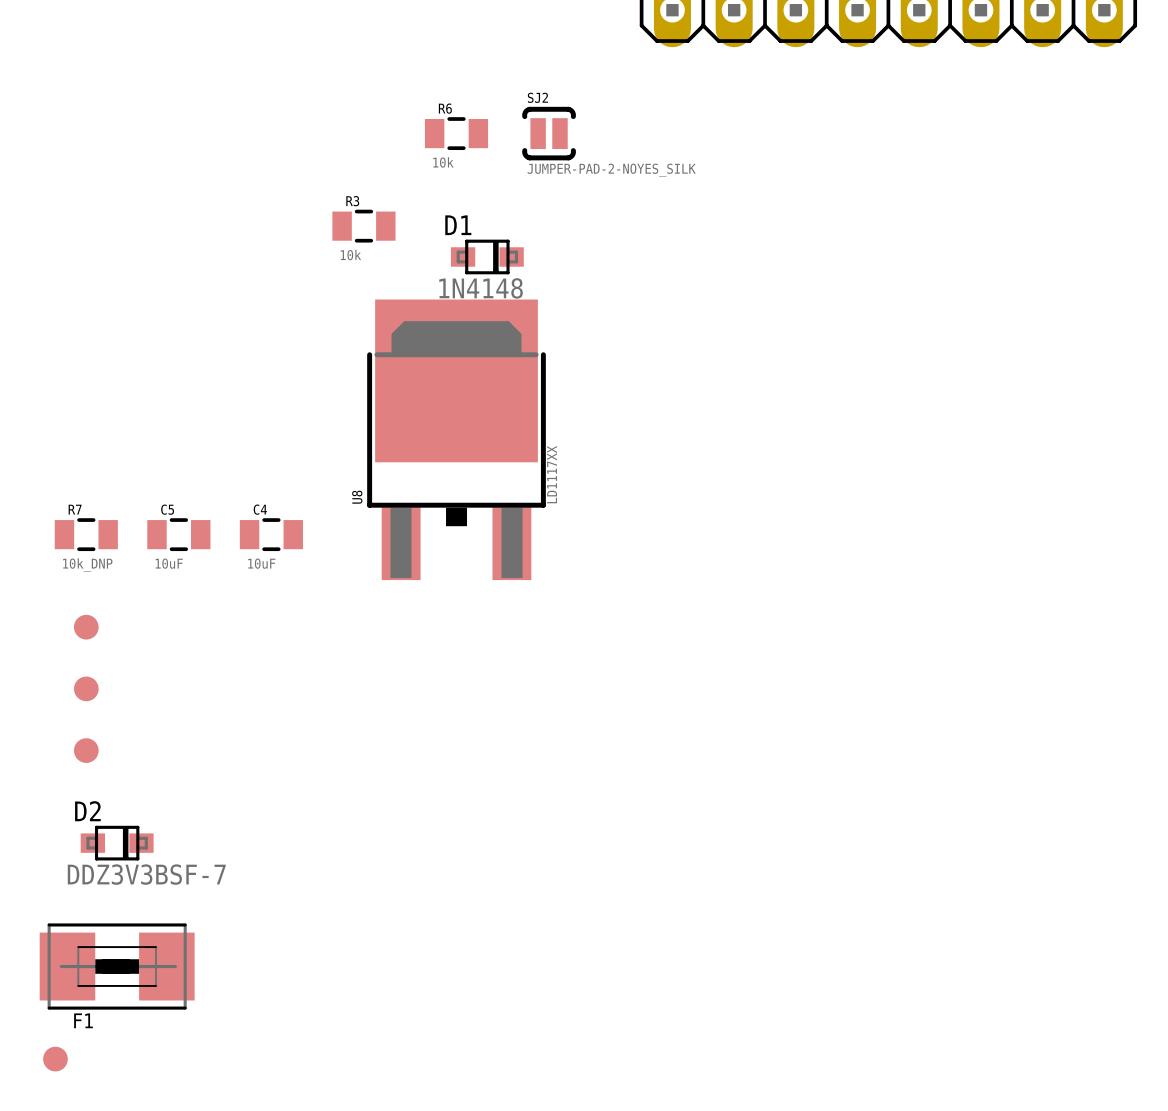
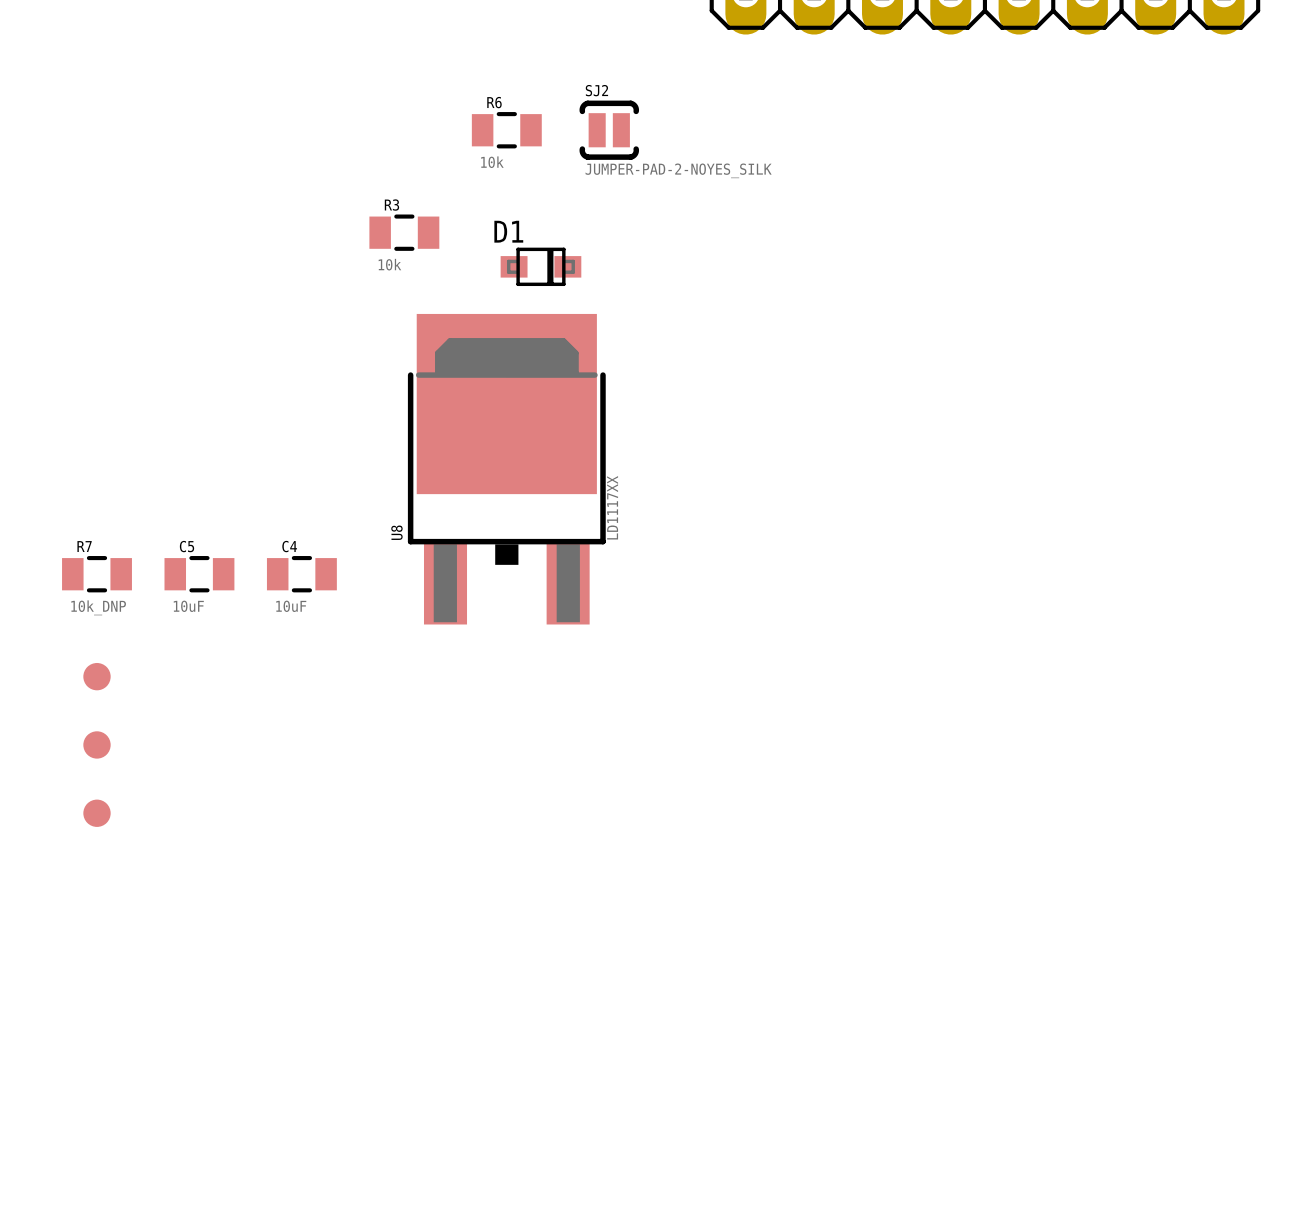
D1 value: 1N4148 (481, 288) -> none
D2: DDZ3V3BSF-7 (117, 843) -> none
F1: (117, 966) -> none
part: (55, 1059) -> none

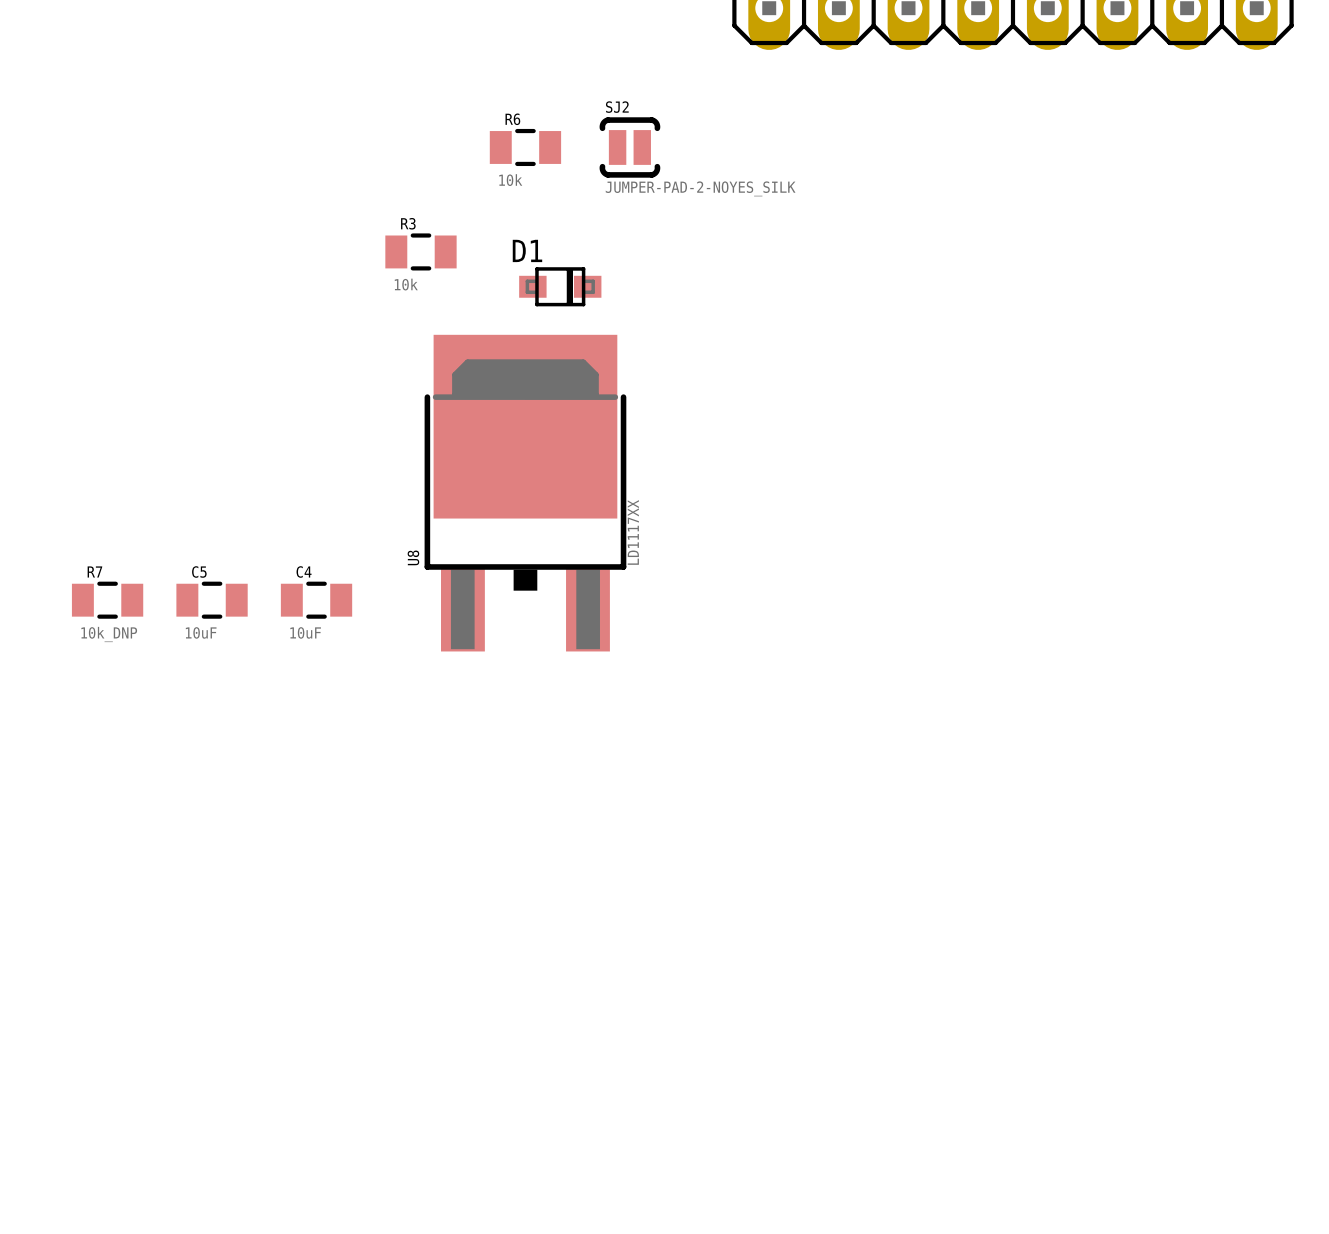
part: (97, 676) -> none
part: (97, 744) -> none
part: (97, 813) -> none

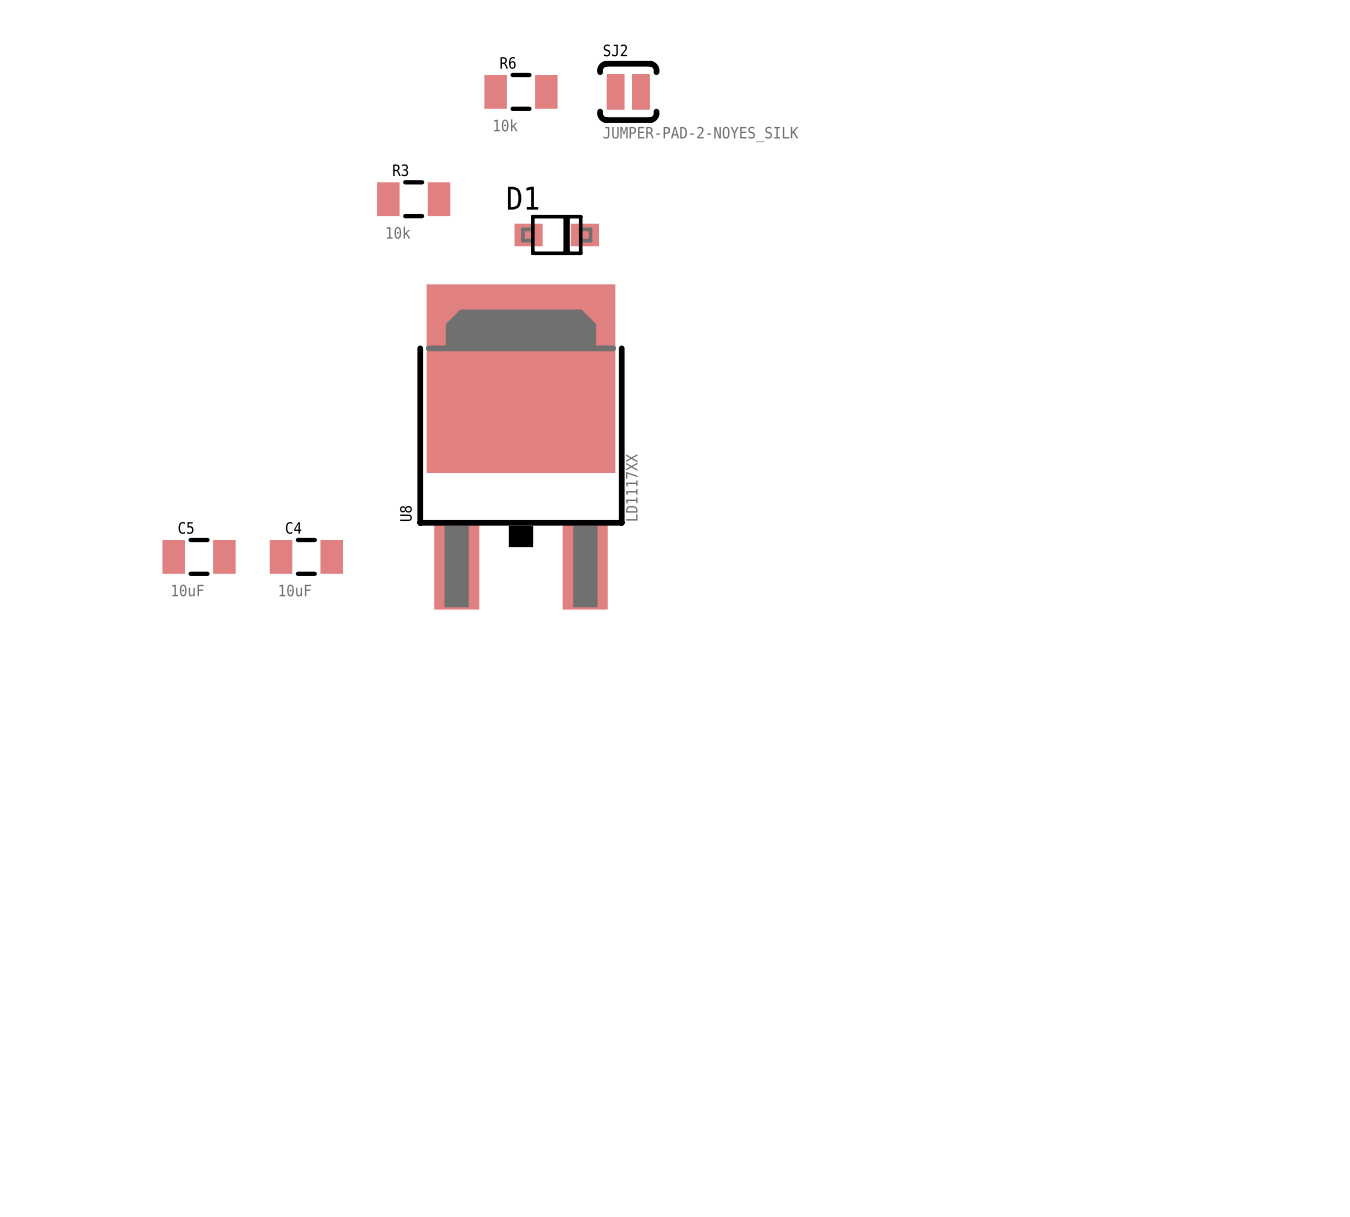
R7: 10k_DNP (107, 600) -> none

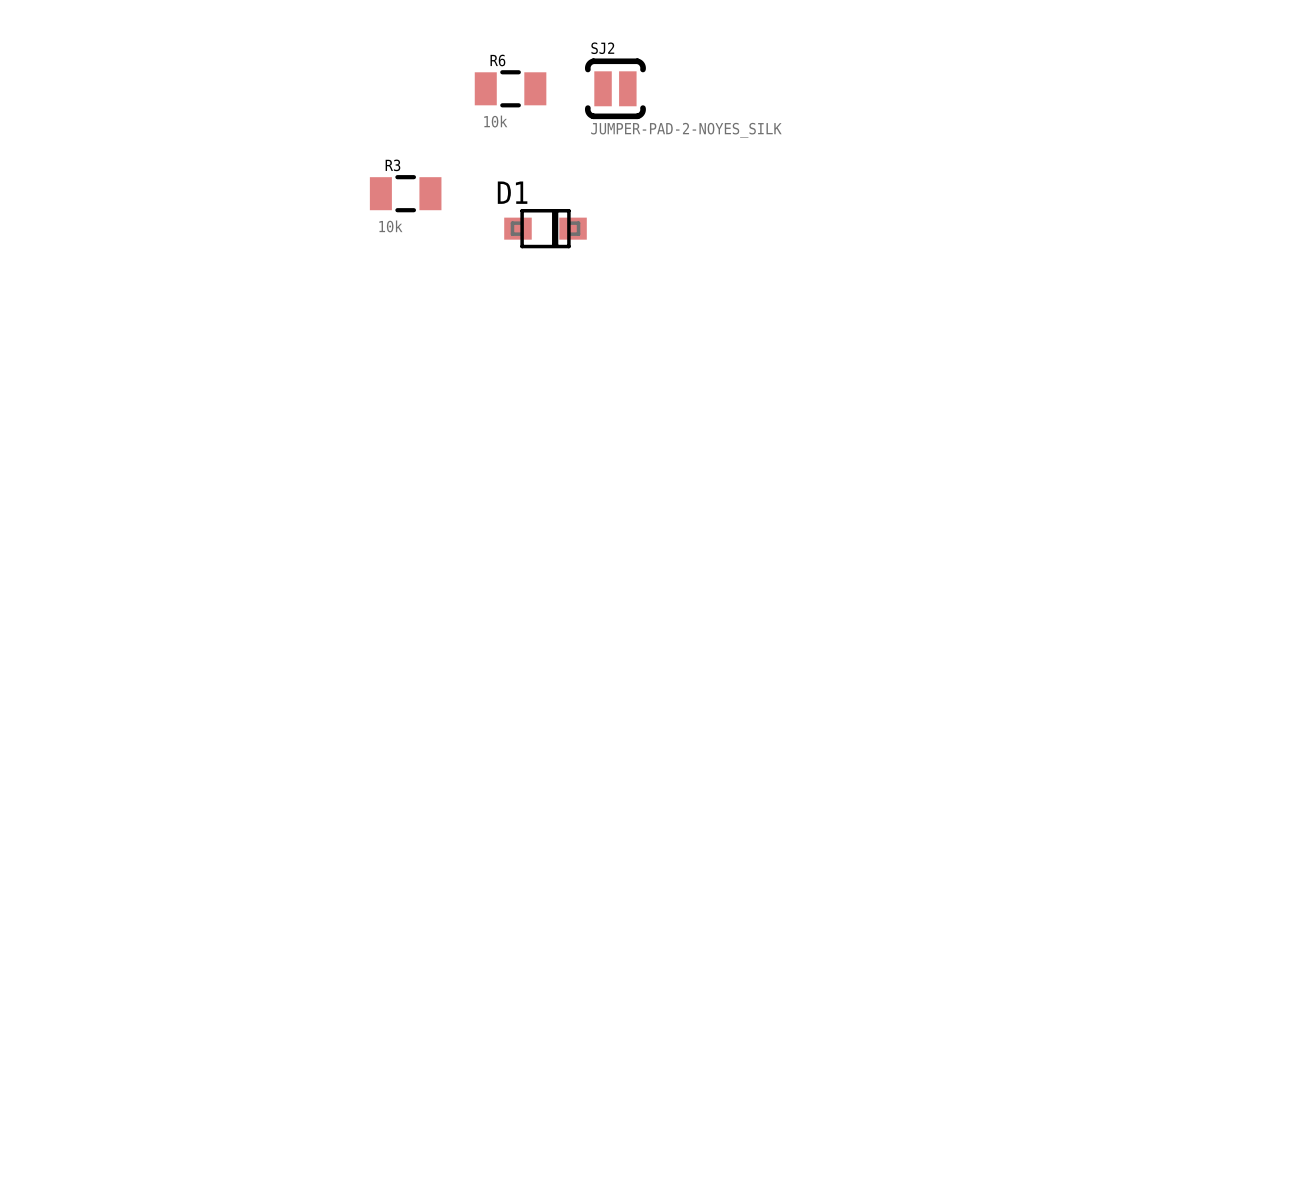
U8: LD1117XX (520, 446) -> none
C5: 10uF (199, 556) -> none
C4: 10uF (306, 556) -> none

